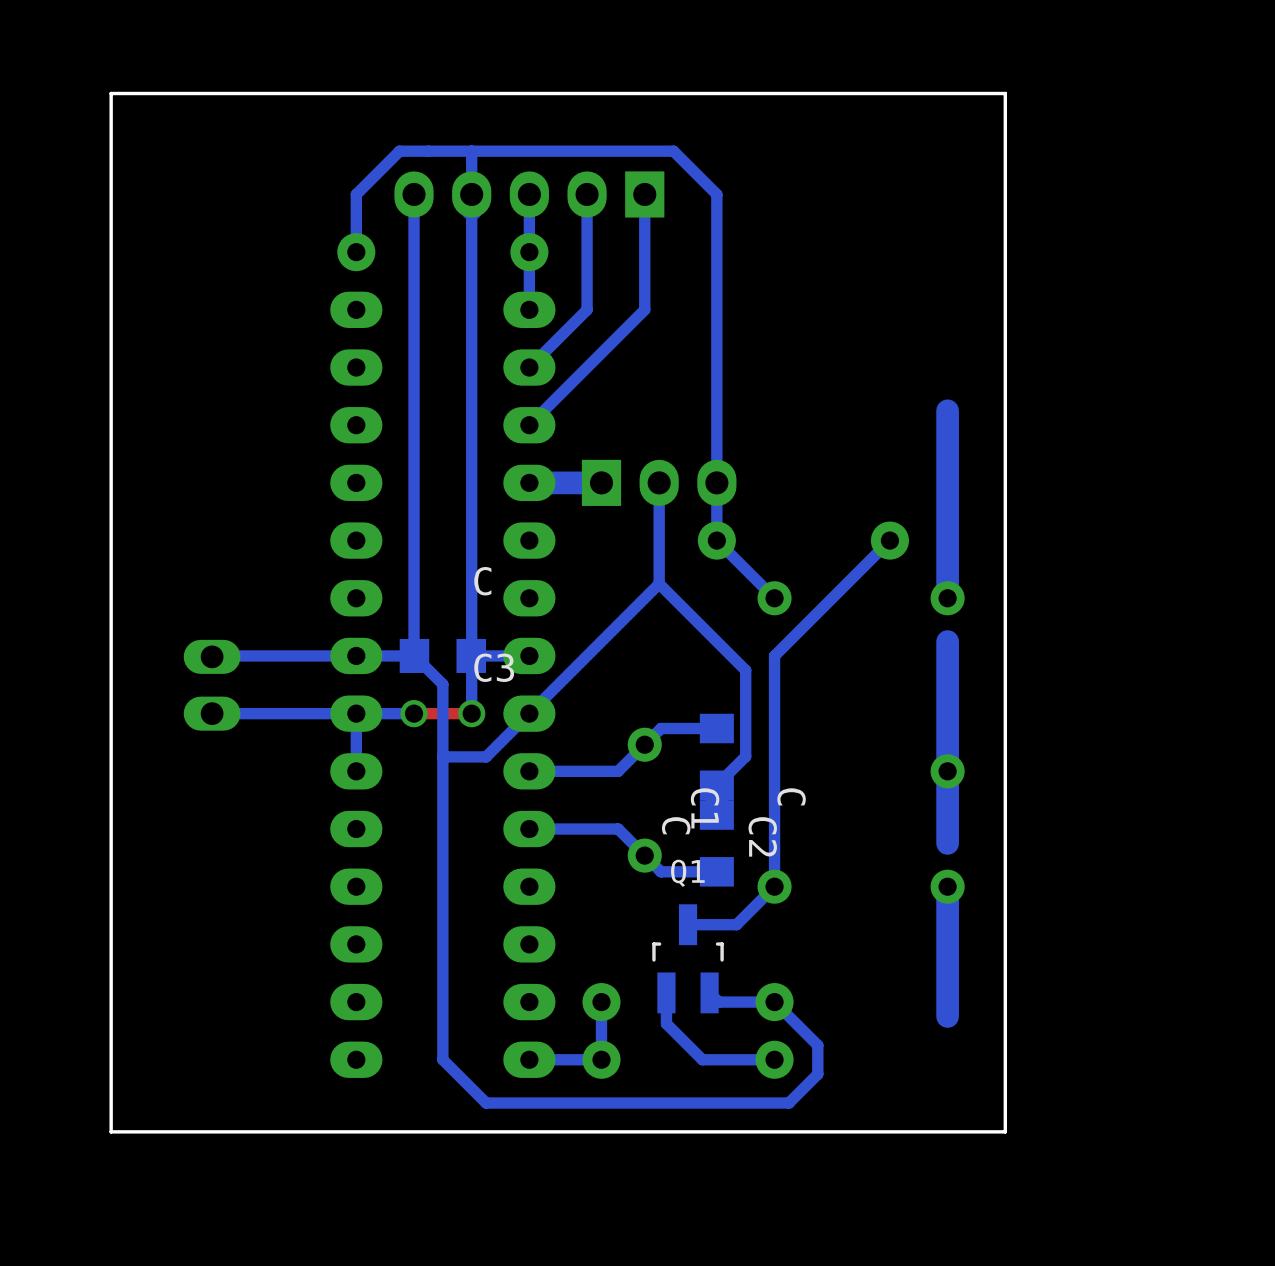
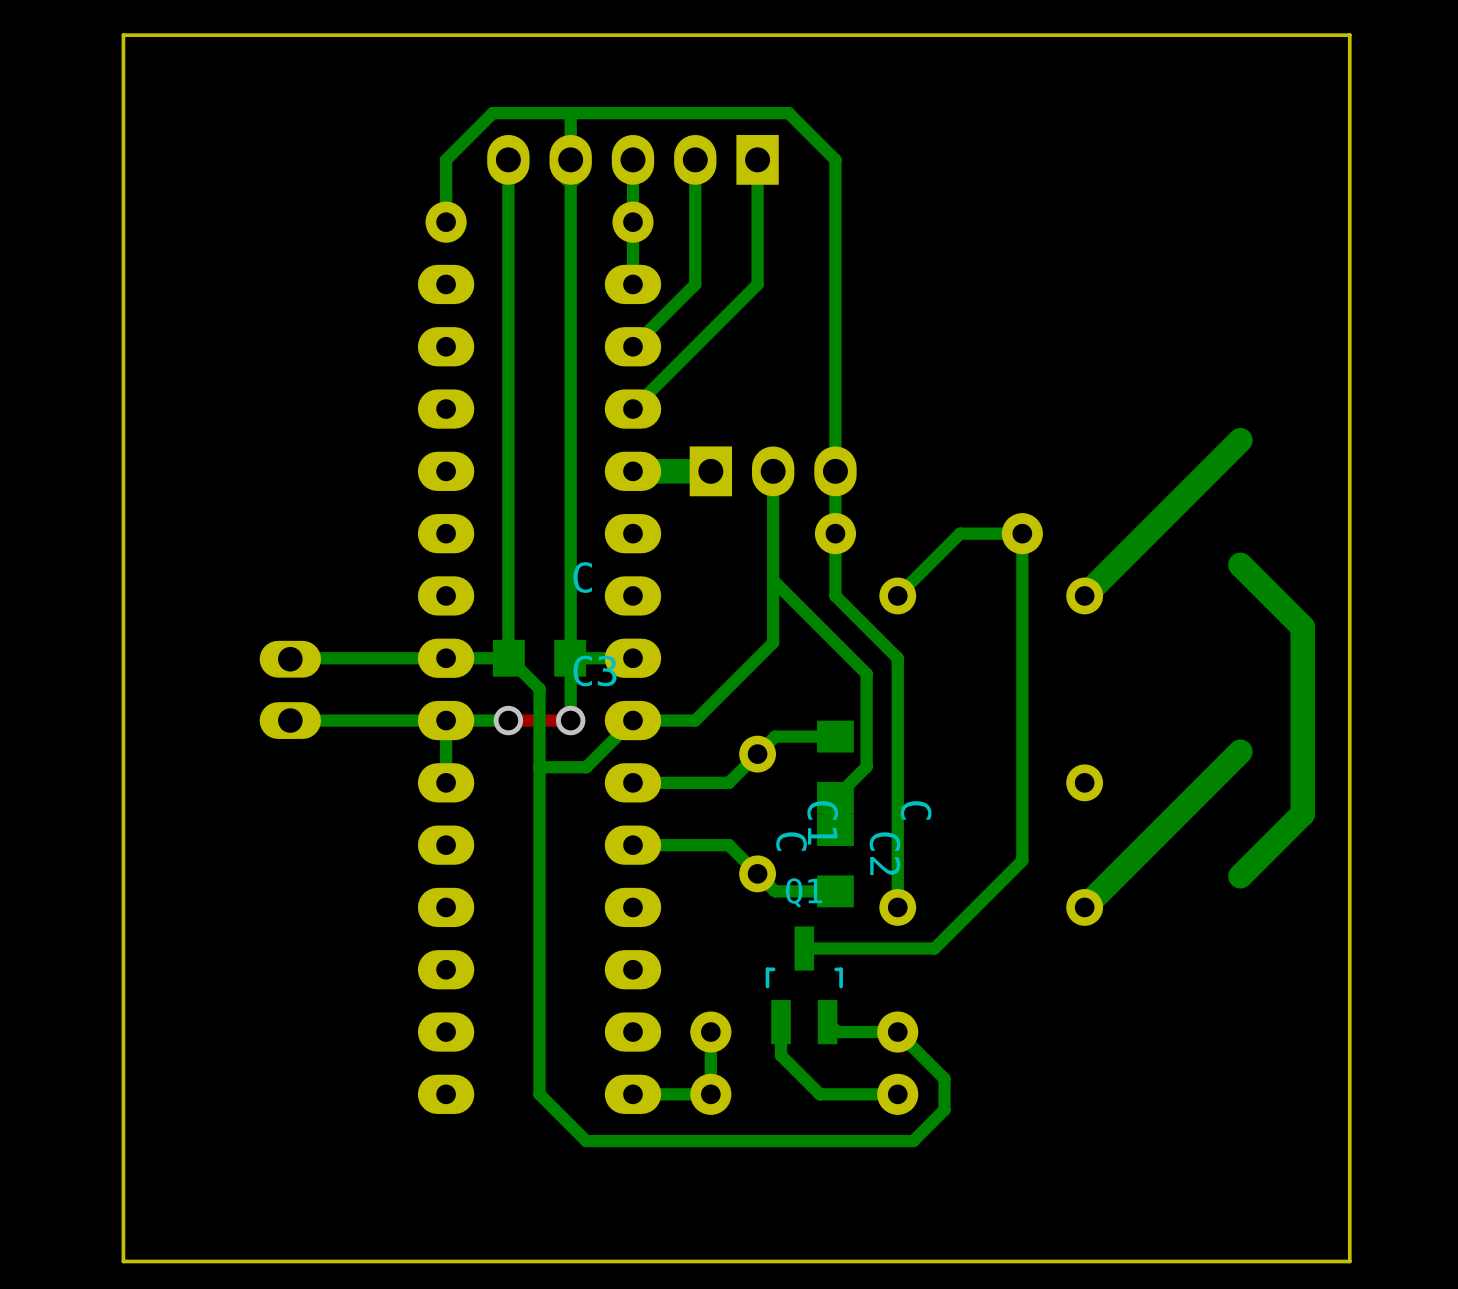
board edge: (1005, 93) (111, 93) (111, 1131) (1005, 1131) (1005, 93) -> (1349, 35) (1349, 1261) (123, 1261) (123, 35) (1349, 35)
bottom track: (947, 410) (947, 598) -> (1240, 440) (1084, 595)
bottom track: (716, 540) (774, 598) -> (835, 533) (835, 595) (897, 658)
bottom track: (889, 540) (774, 655) -> none
bottom track: none -> (1240, 564) (1302, 627) (1302, 813) (1240, 876)
bottom track: (659, 583) (529, 713) -> (773, 580) (773, 642) (695, 720) (632, 720)
bottom track: (947, 641) (947, 843) -> none
bottom track: (774, 886) (736, 924) -> (897, 595) (960, 533) (1022, 533) (1022, 860) (934, 948) (856, 948)
bottom track: (947, 886) (947, 1016) -> (1084, 907) (1240, 751)

